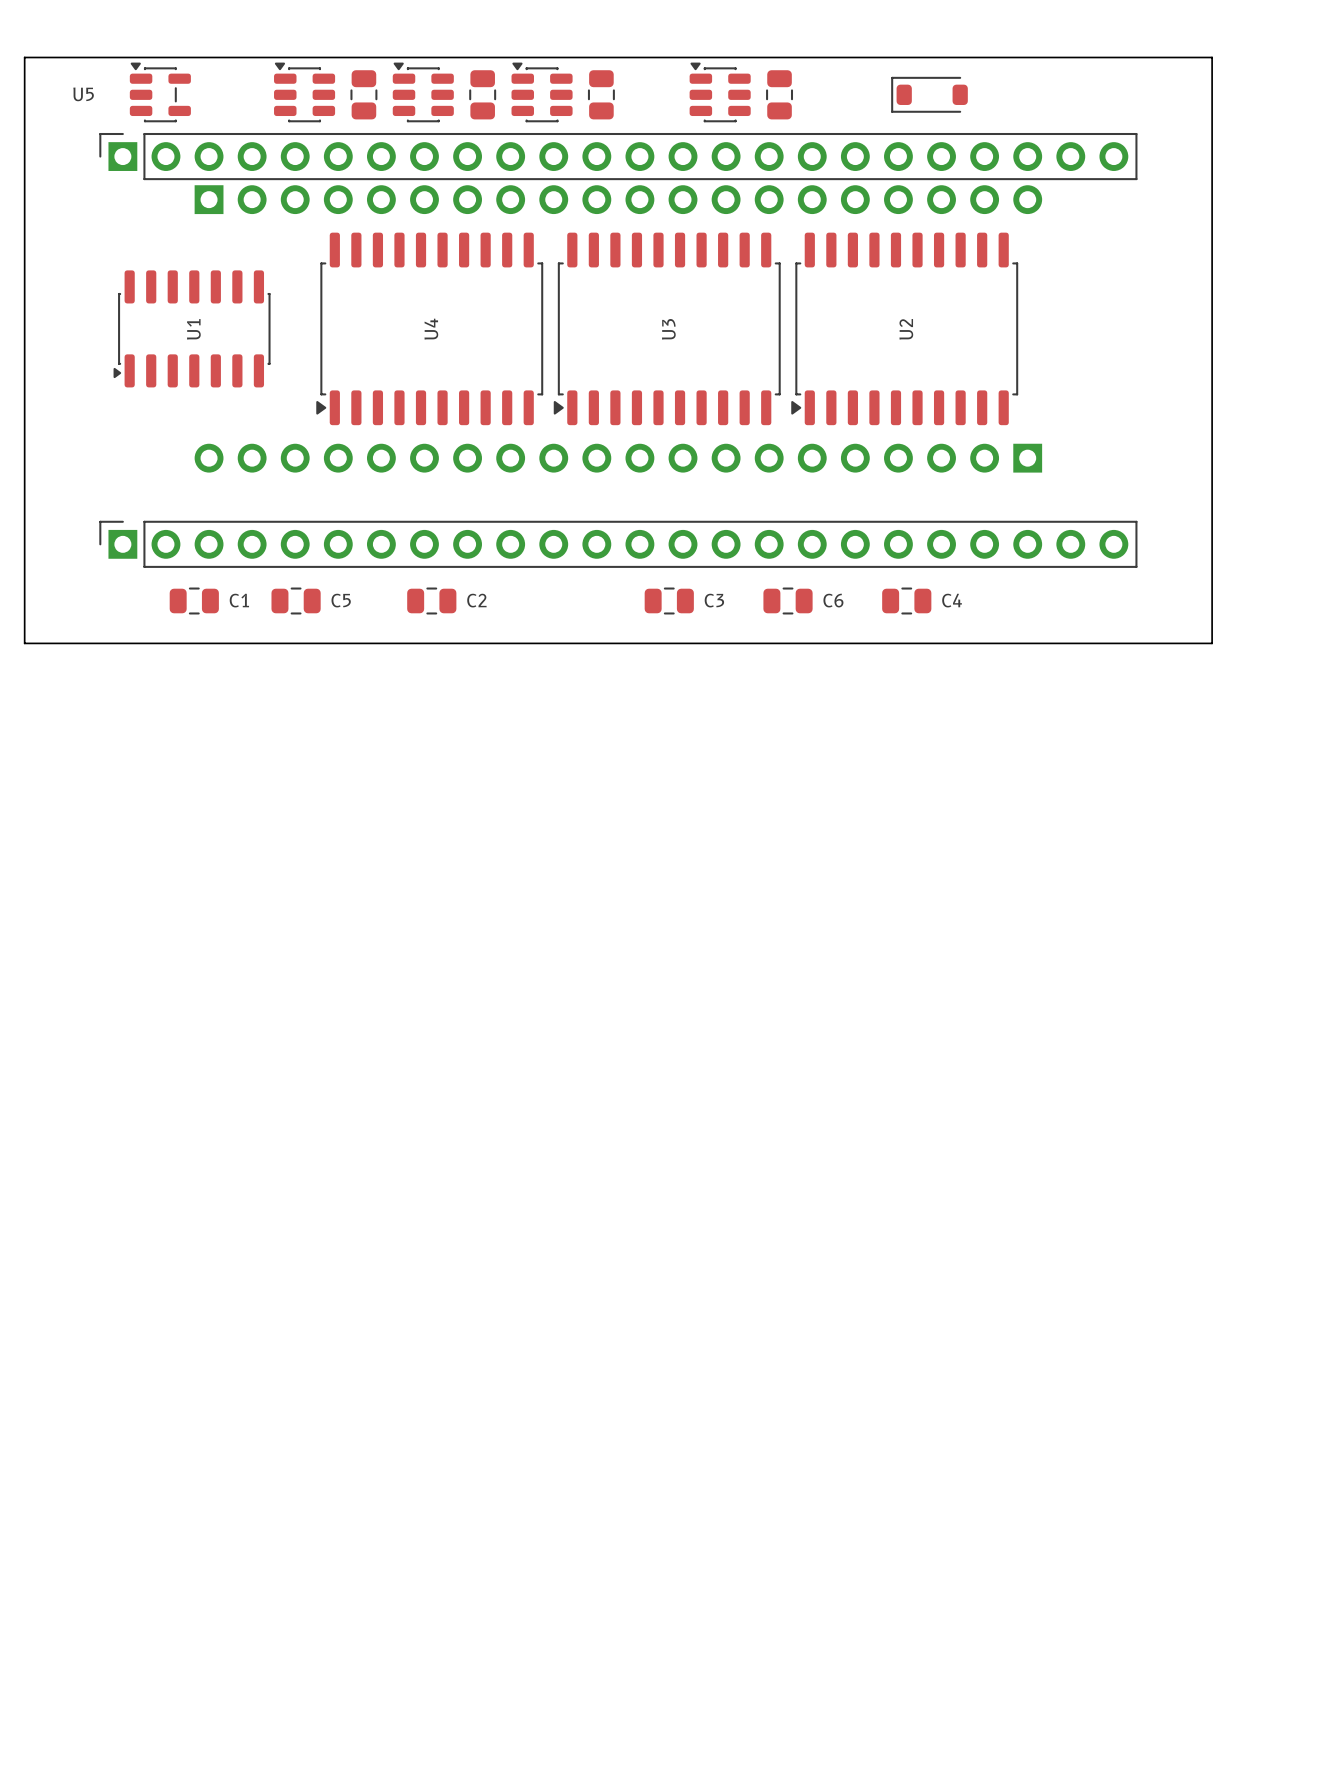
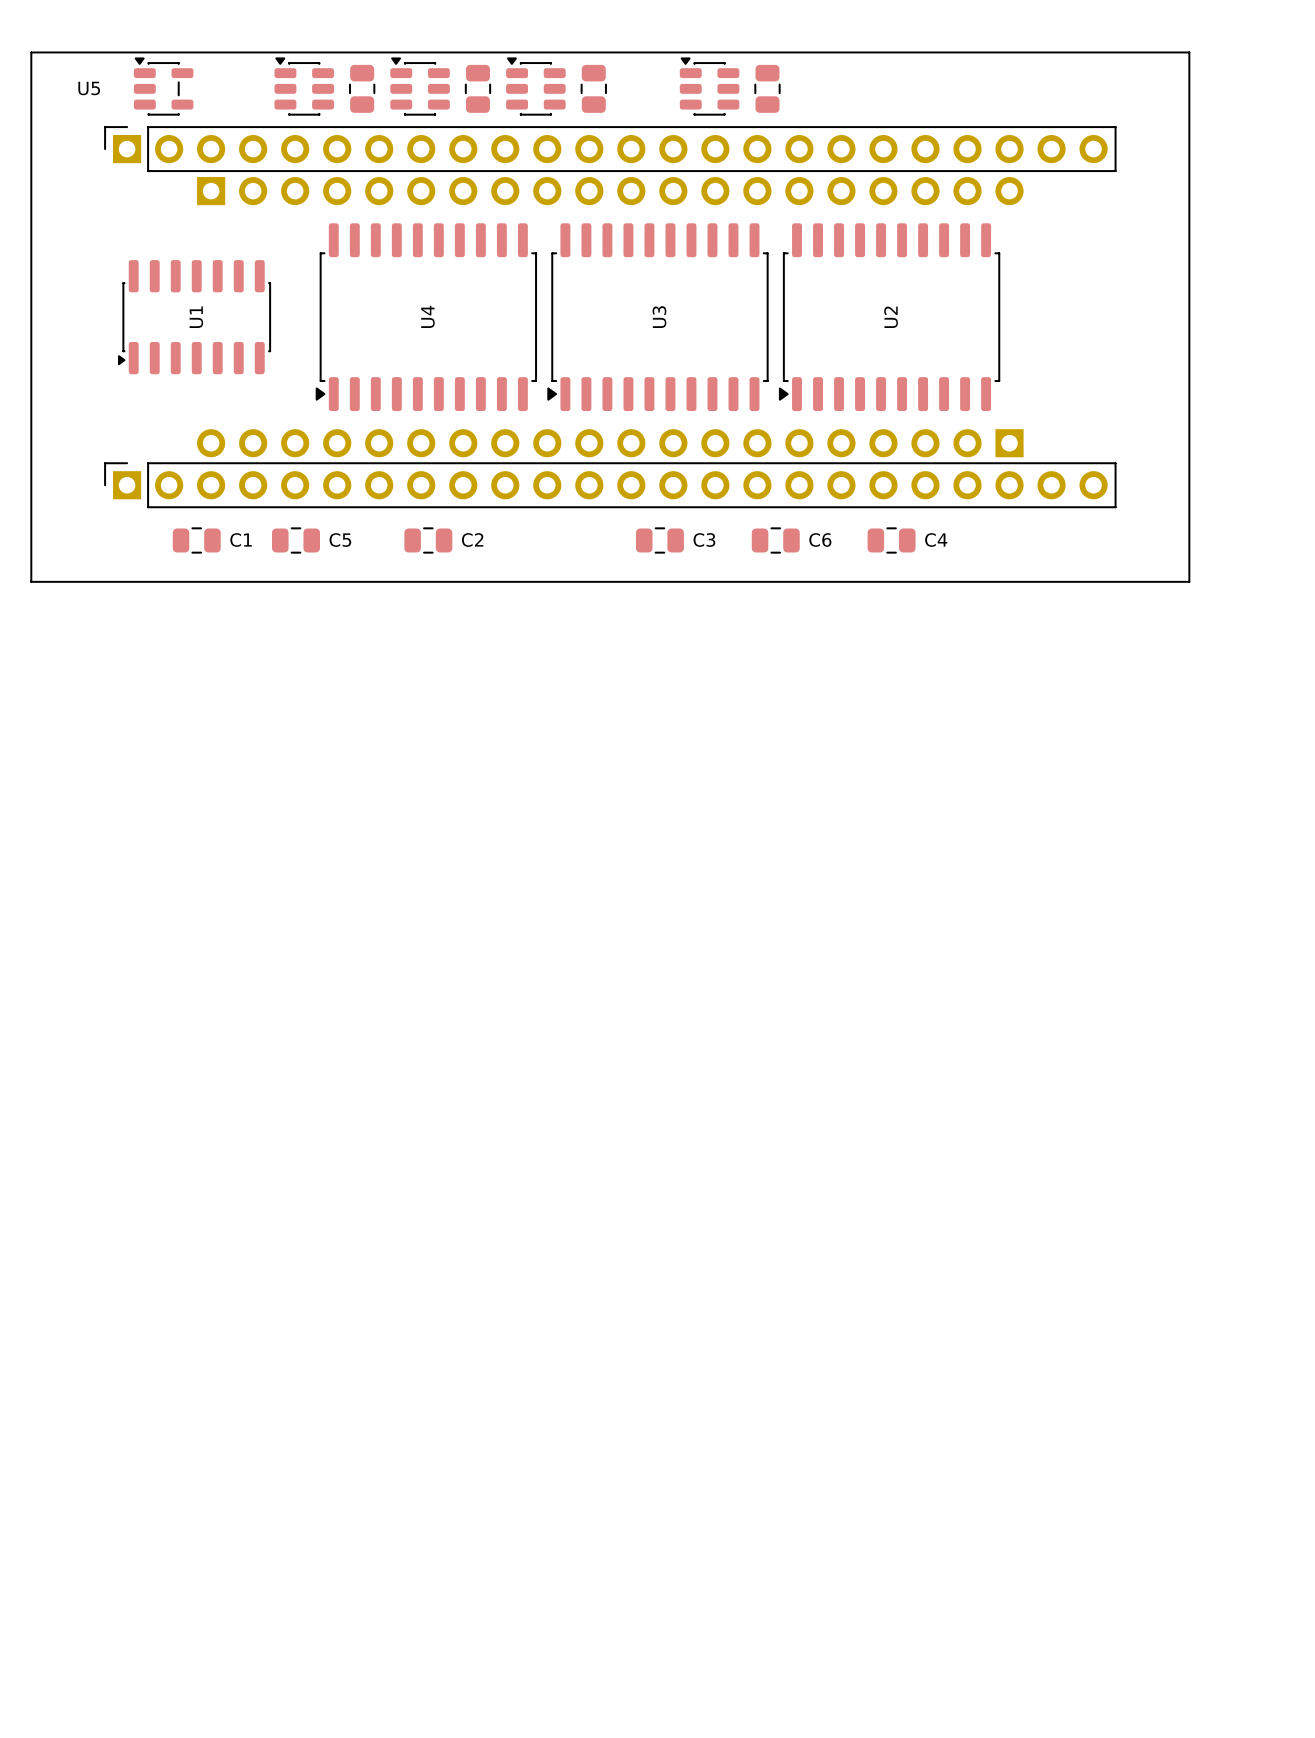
part: (929, 94) -> none
part position: (618, 544) -> (610, 485)
board edge: (24, 600) (24, 643) (1212, 643) (1212, 600) -> (31, 581) (1189, 581)
C1 position: (194, 601) -> (196, 540)
C5 position: (296, 601) -> (296, 540)
C2 position: (431, 601) -> (428, 540)
C3 position: (669, 601) -> (659, 540)
C6 position: (788, 601) -> (775, 540)
C4 position: (906, 601) -> (891, 540)

